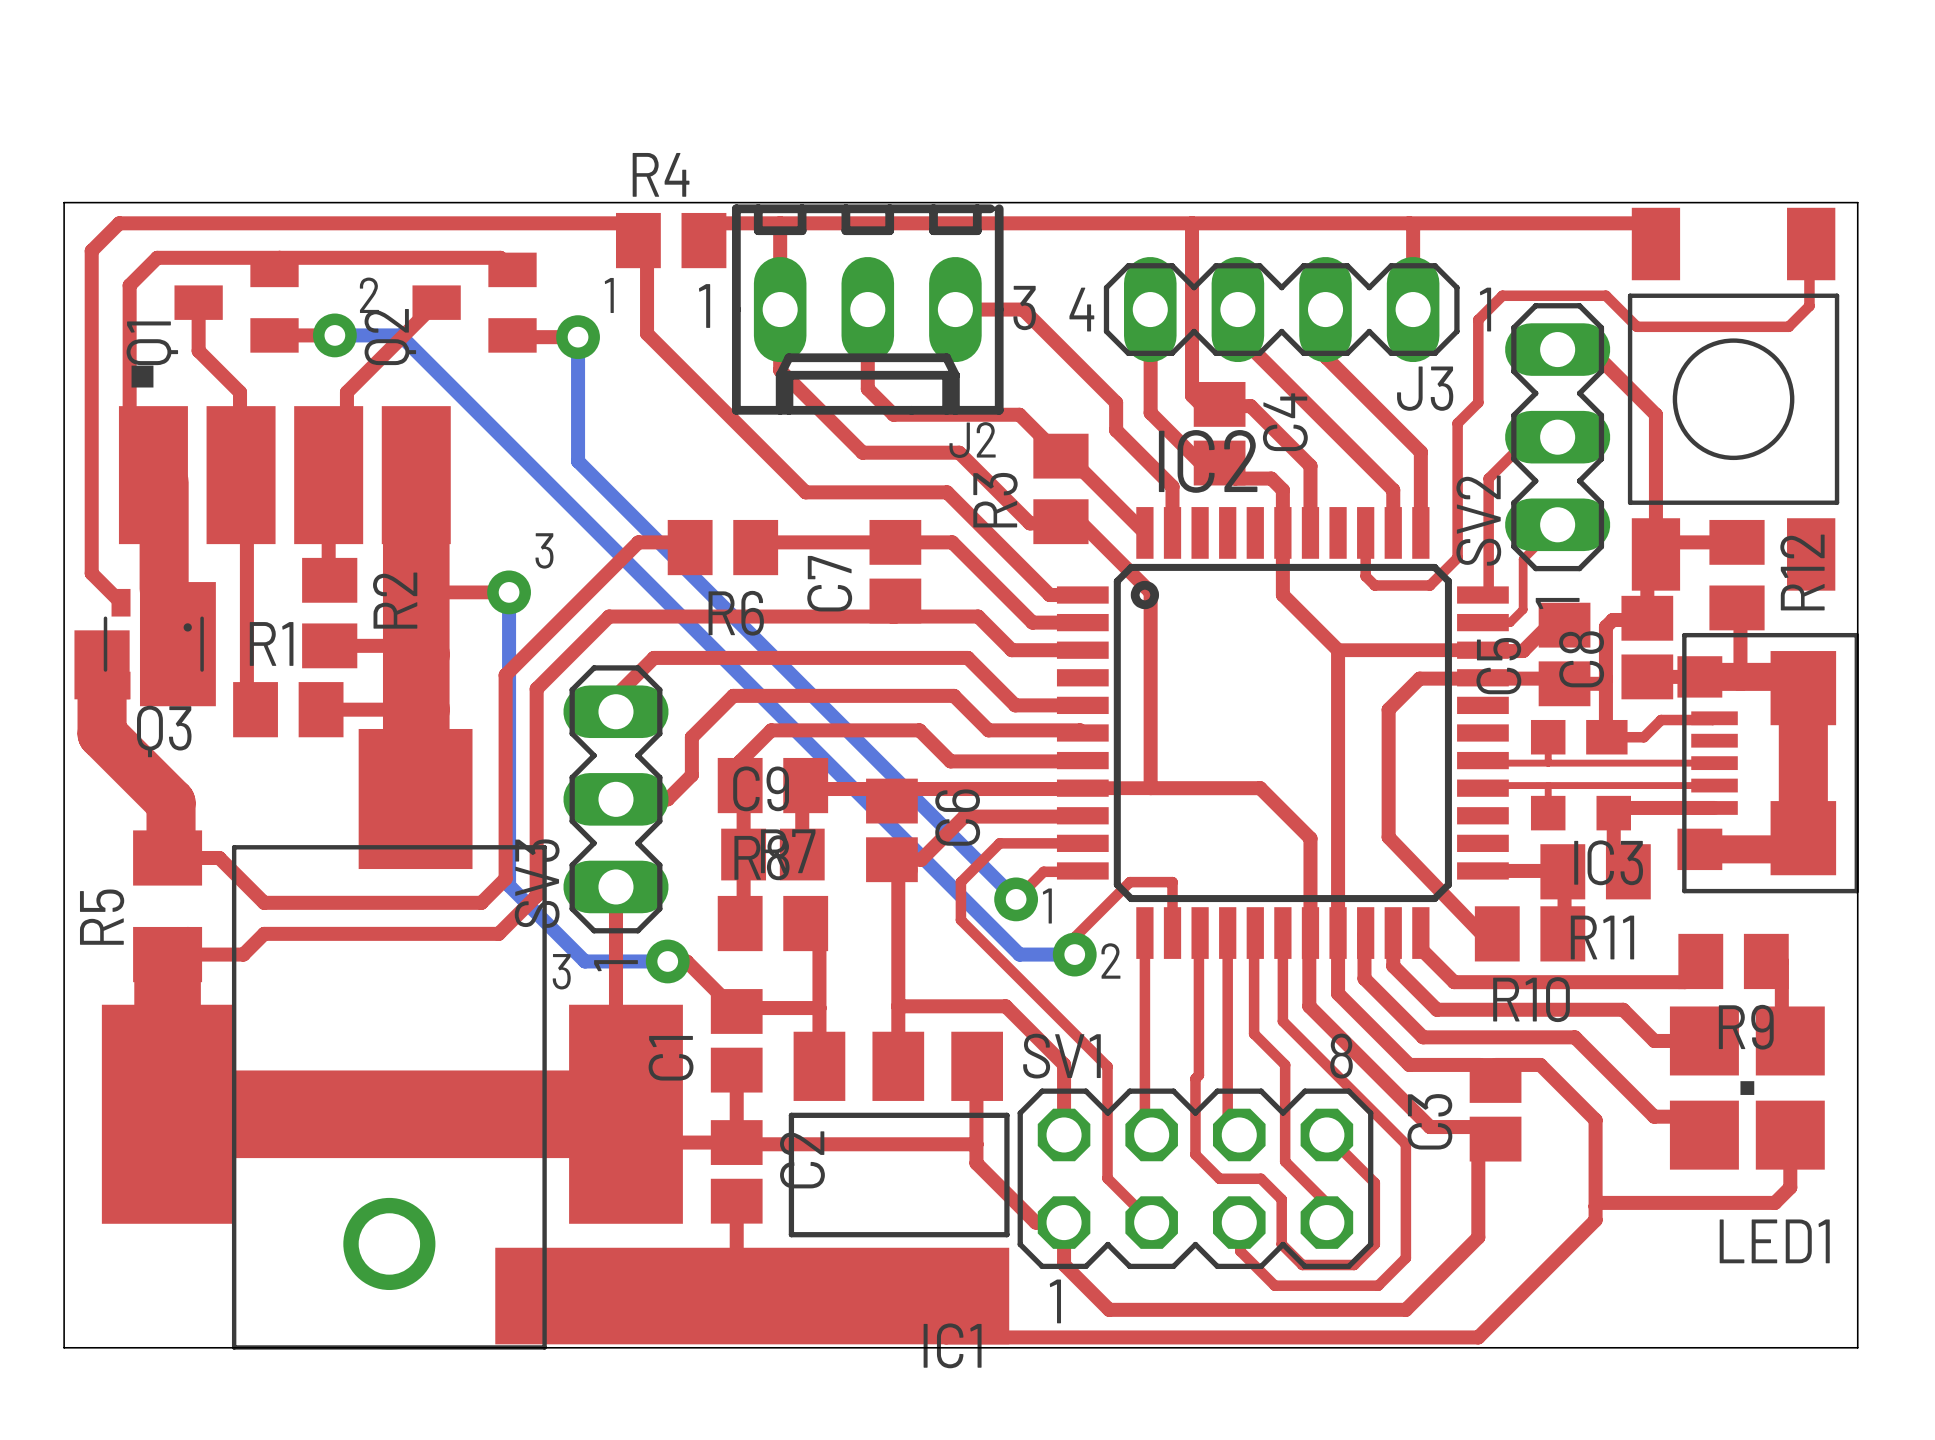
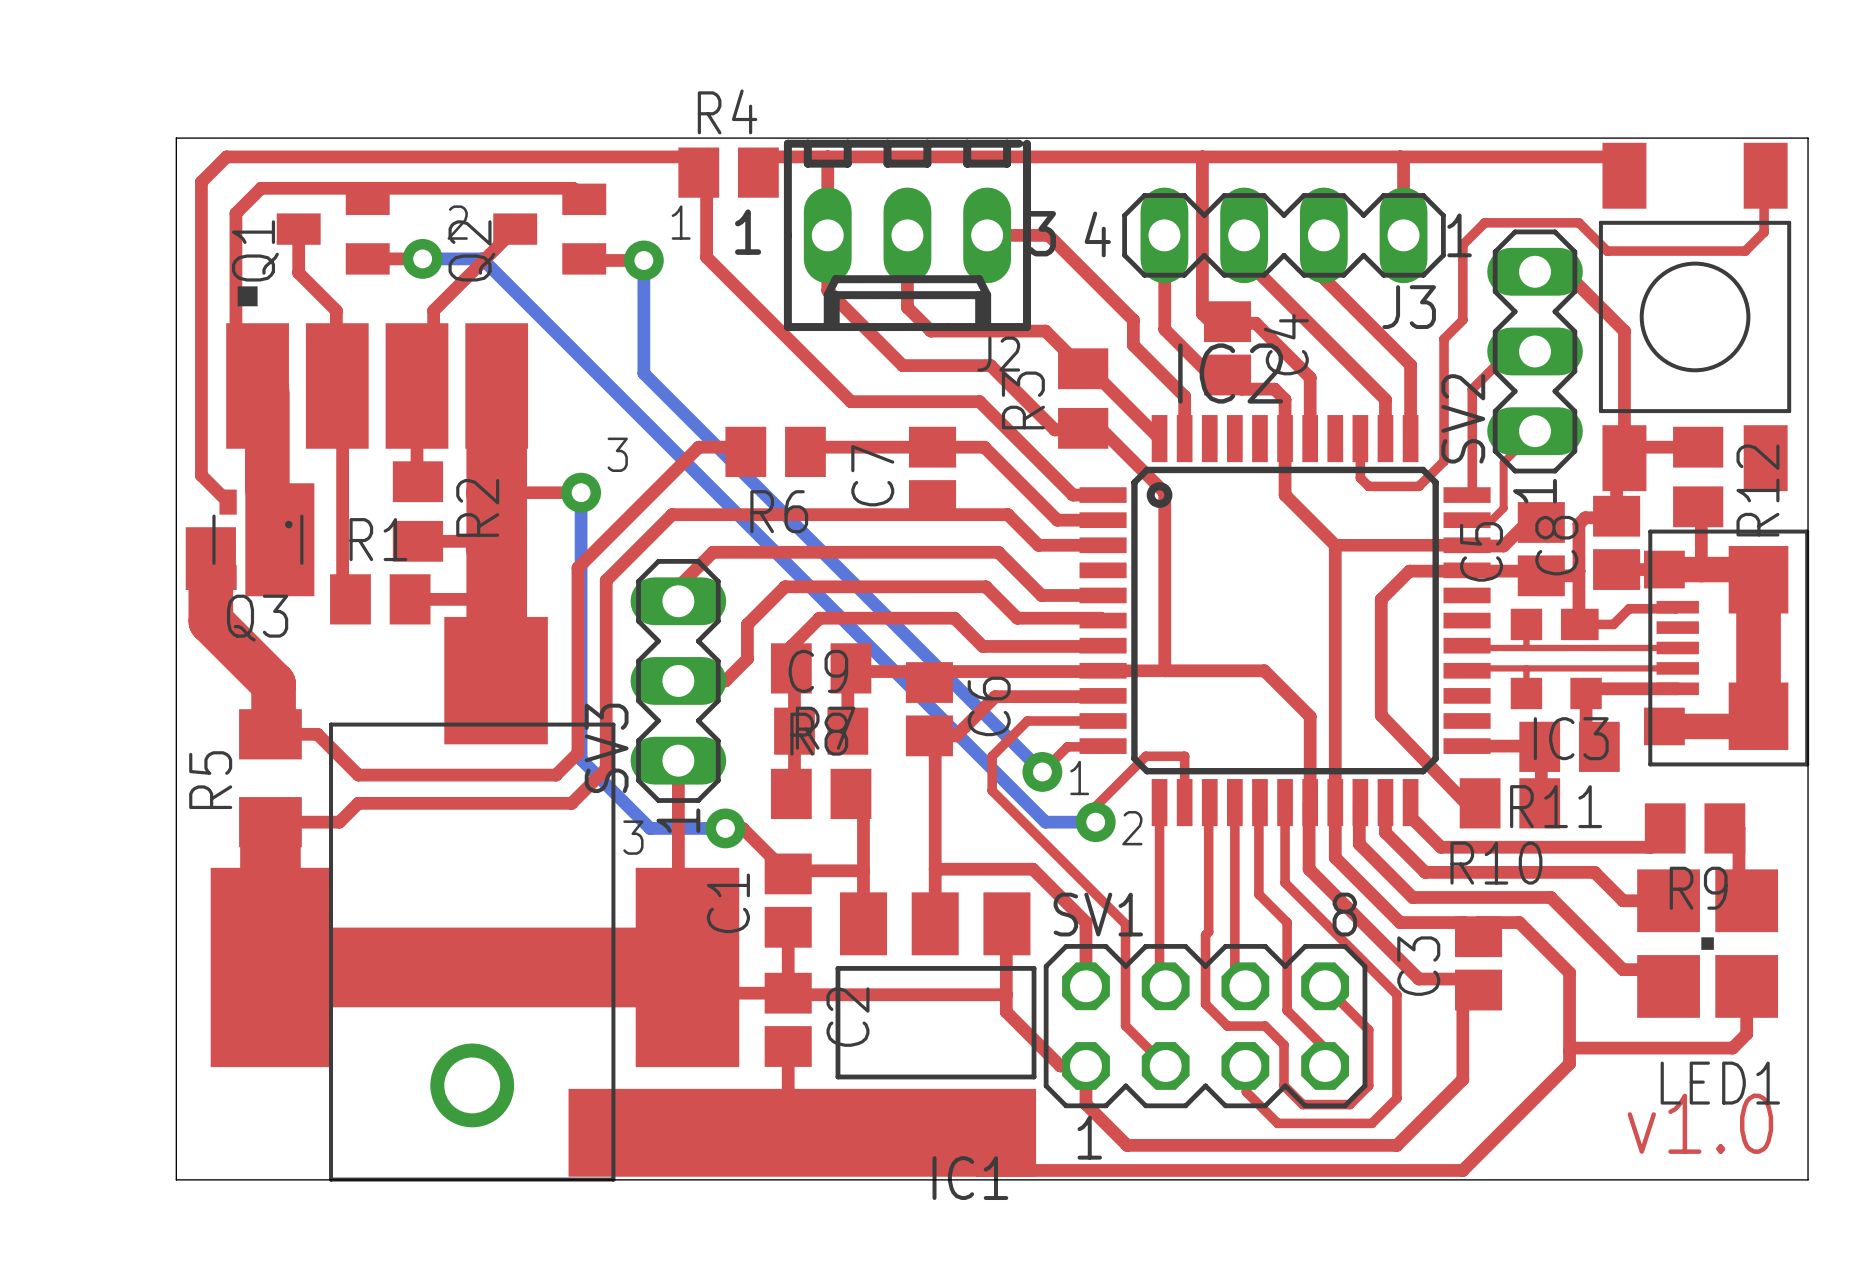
text: none -> v1.0 (1700, 1123)

